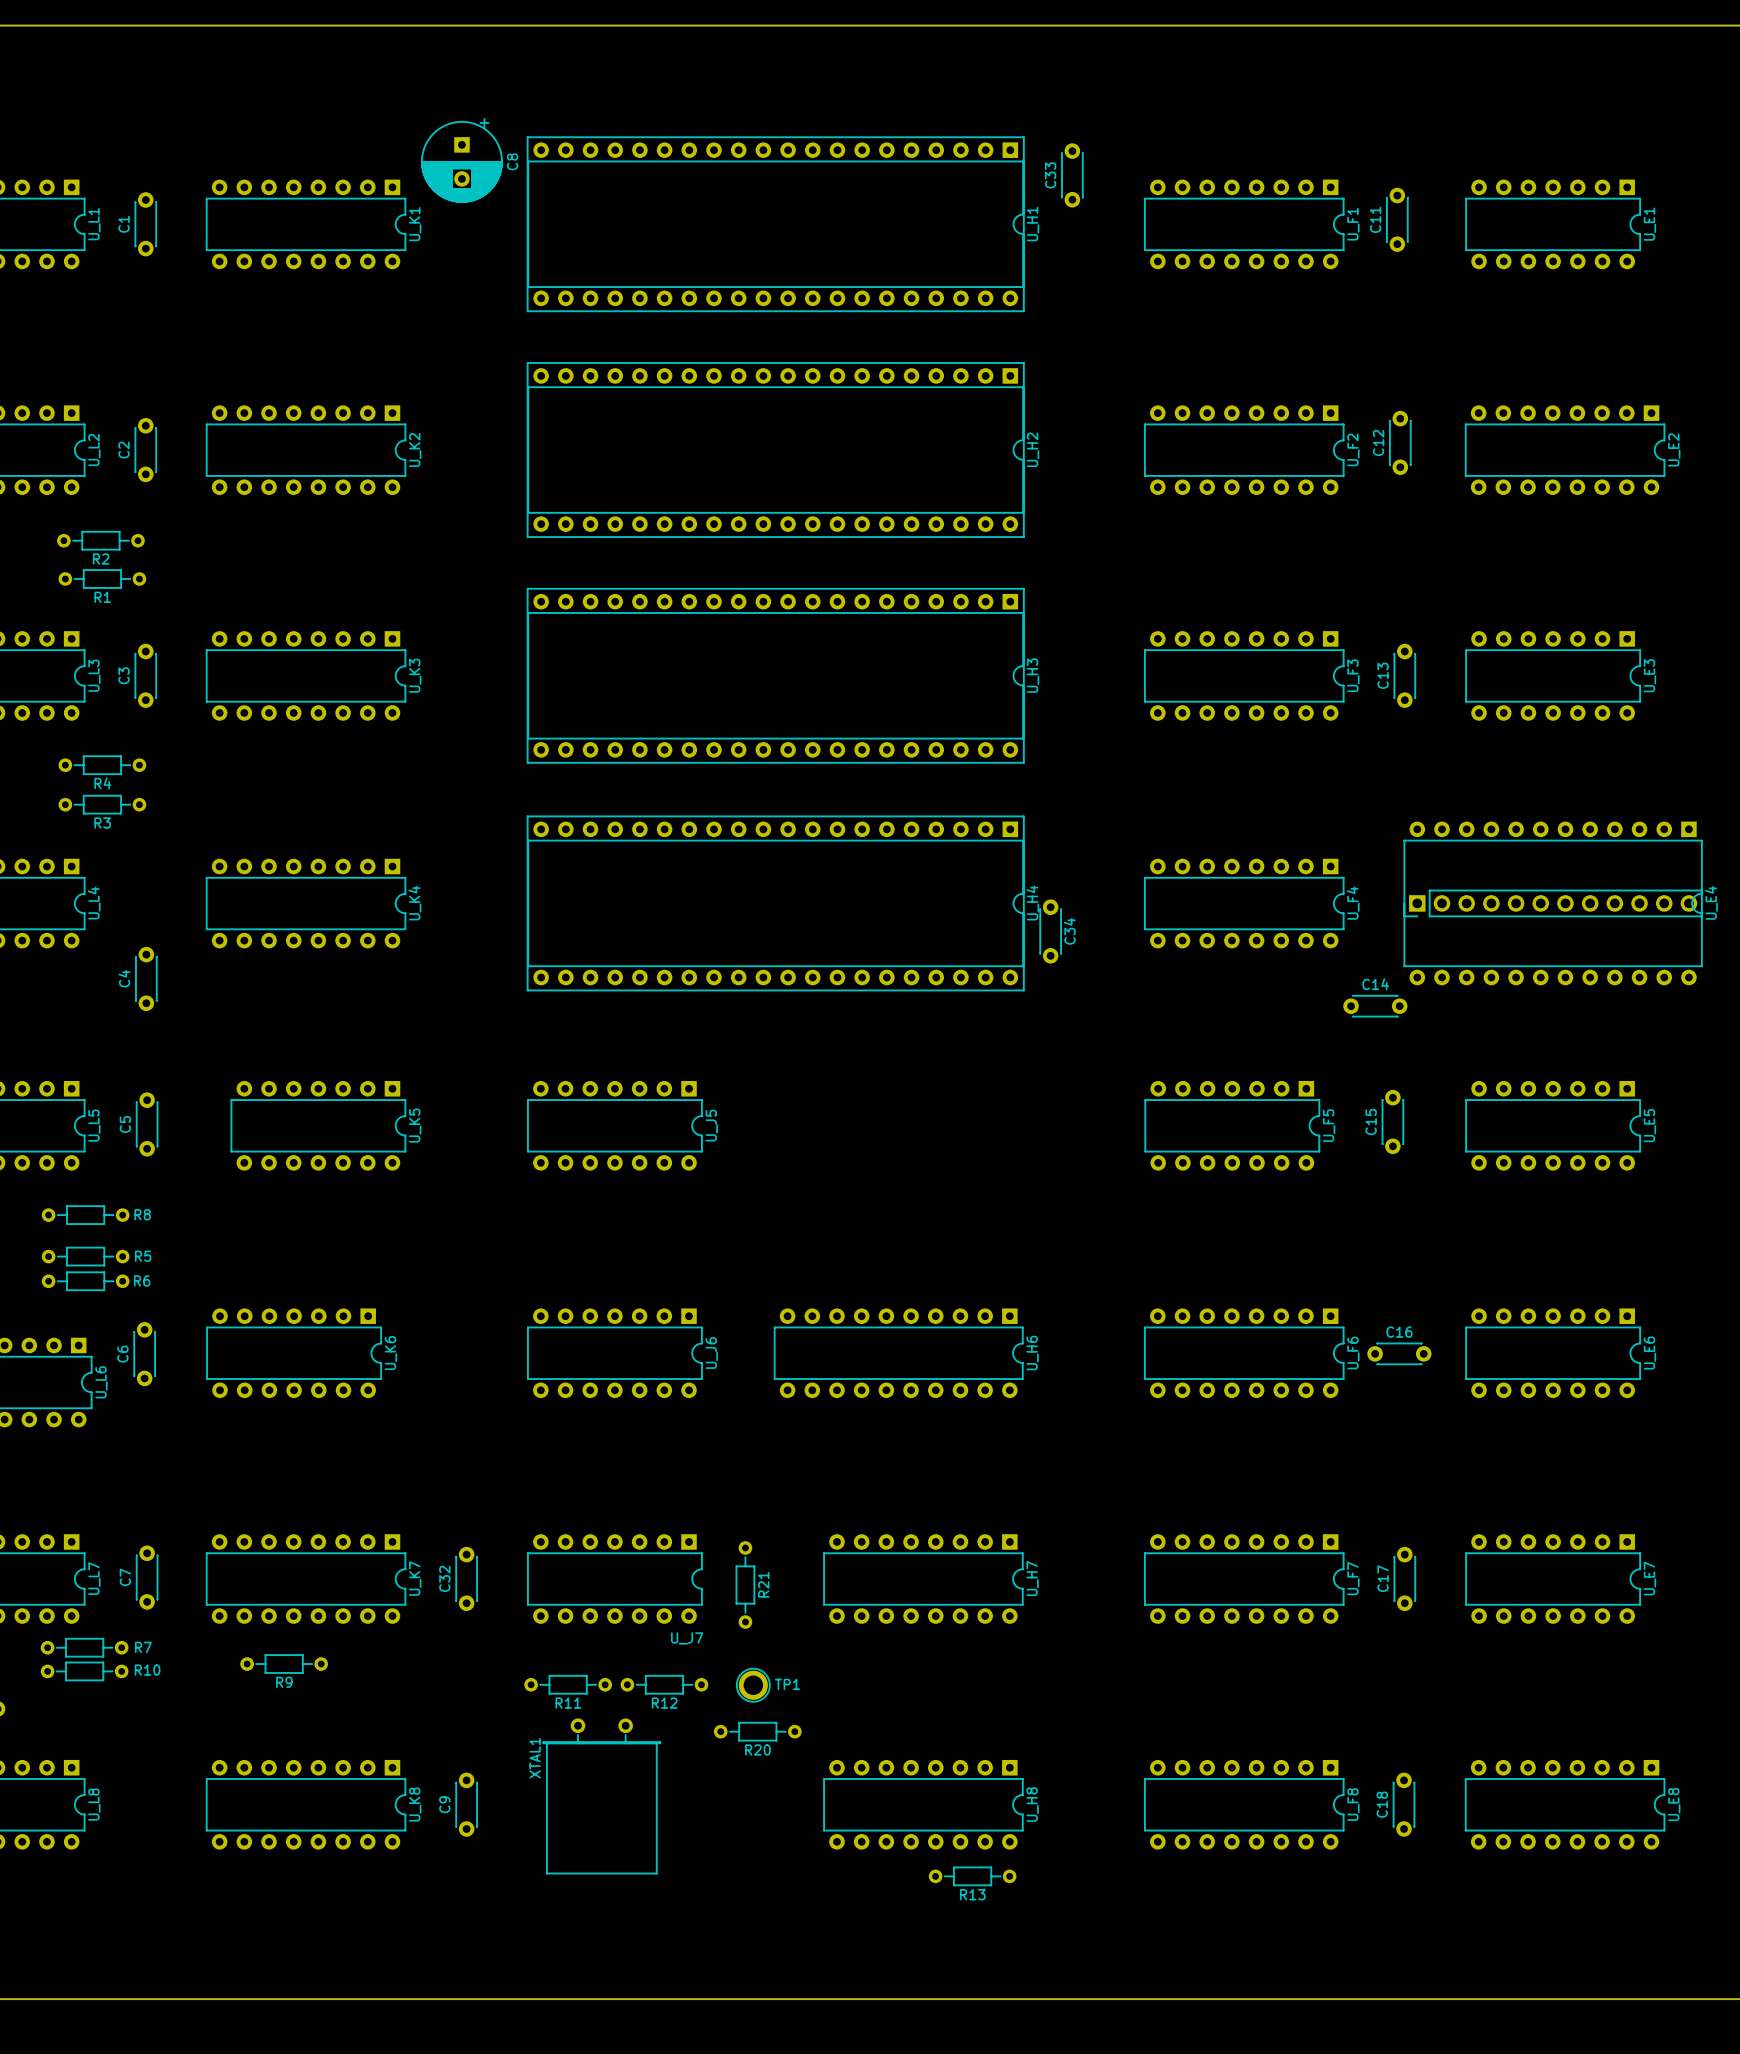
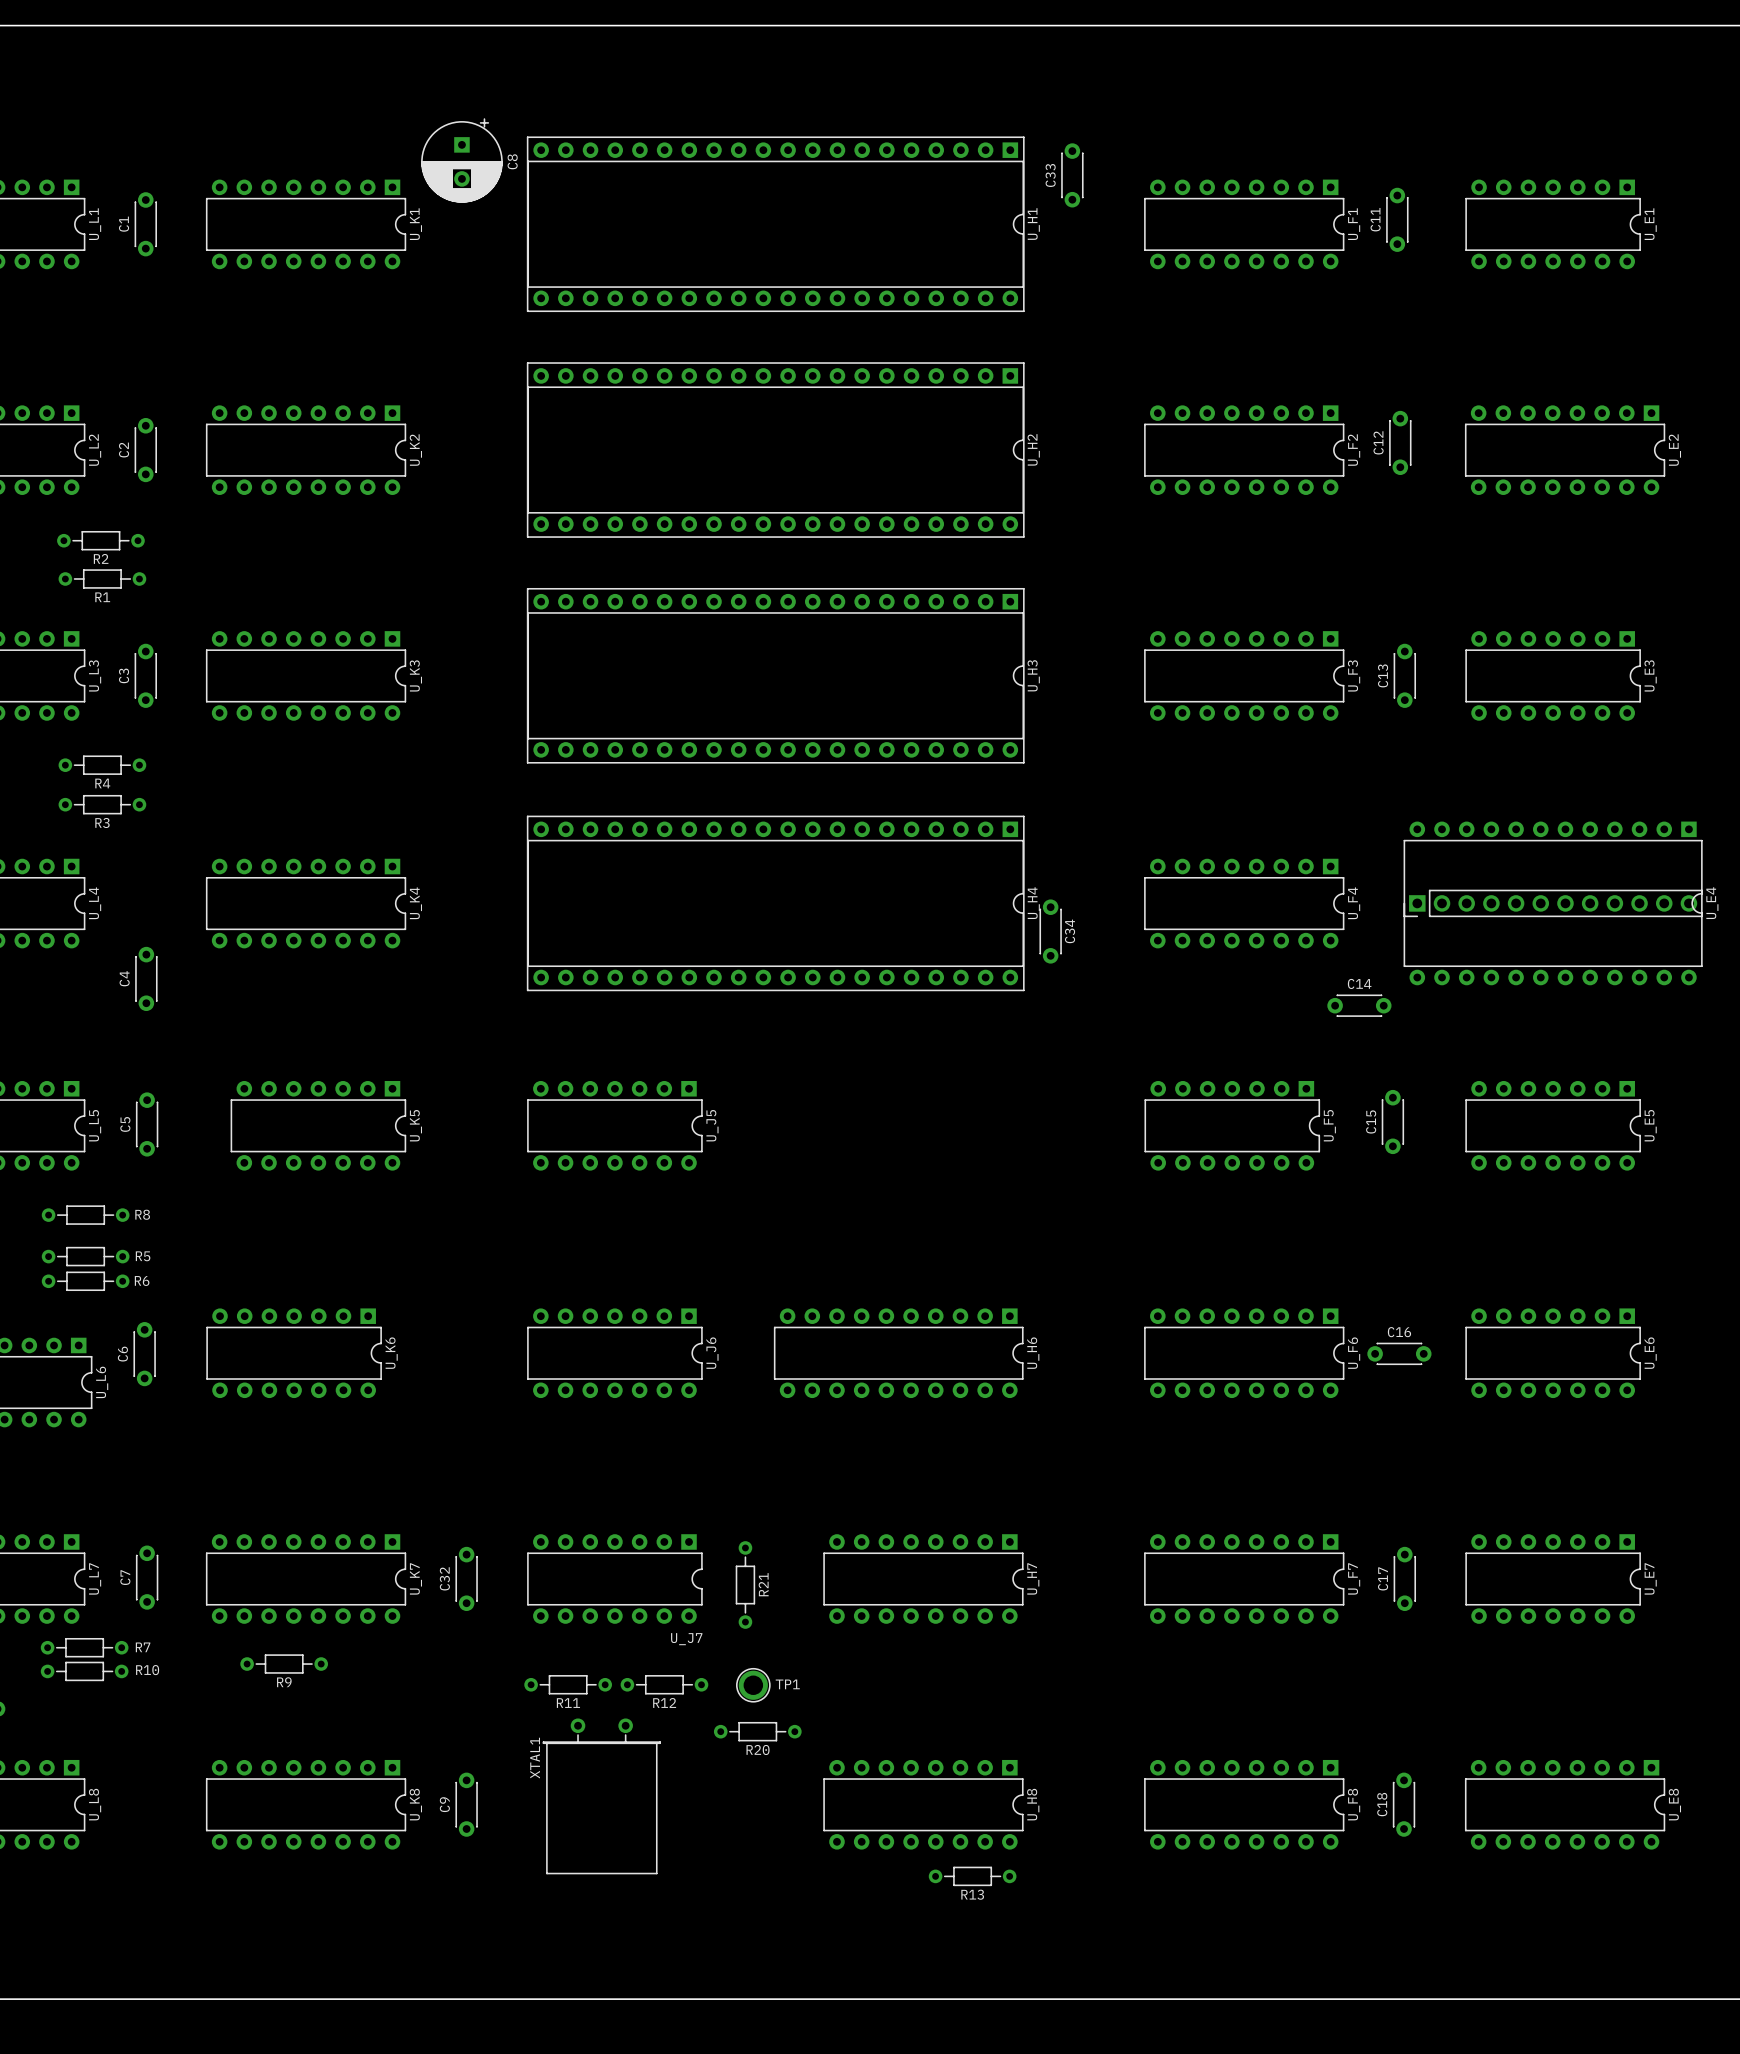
C14 position: (1375, 1006) -> (1359, 1005)

